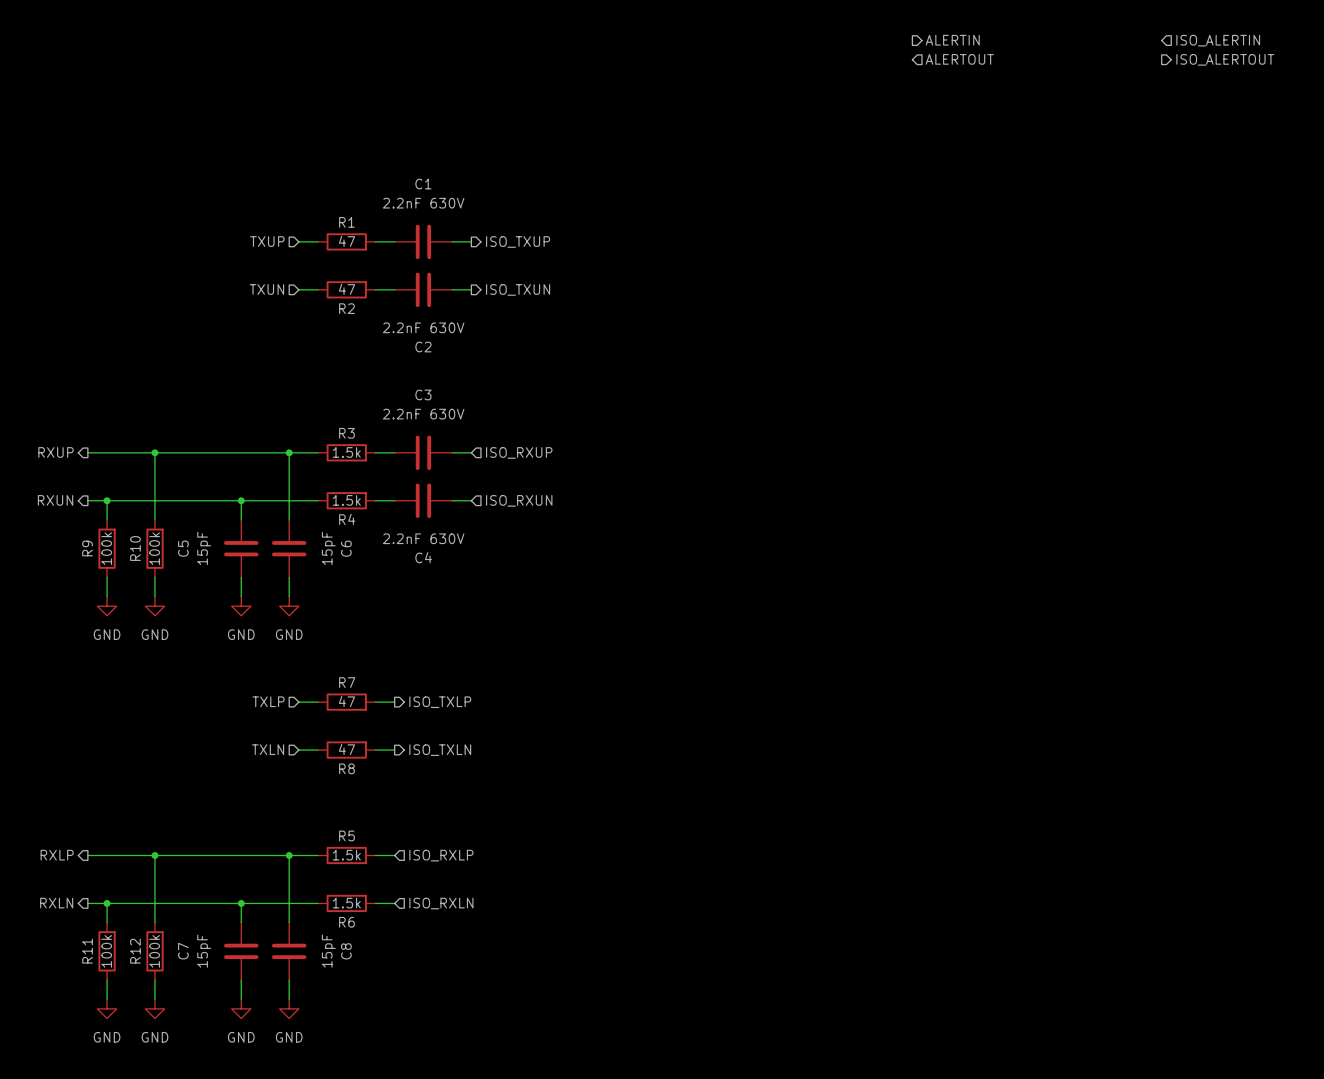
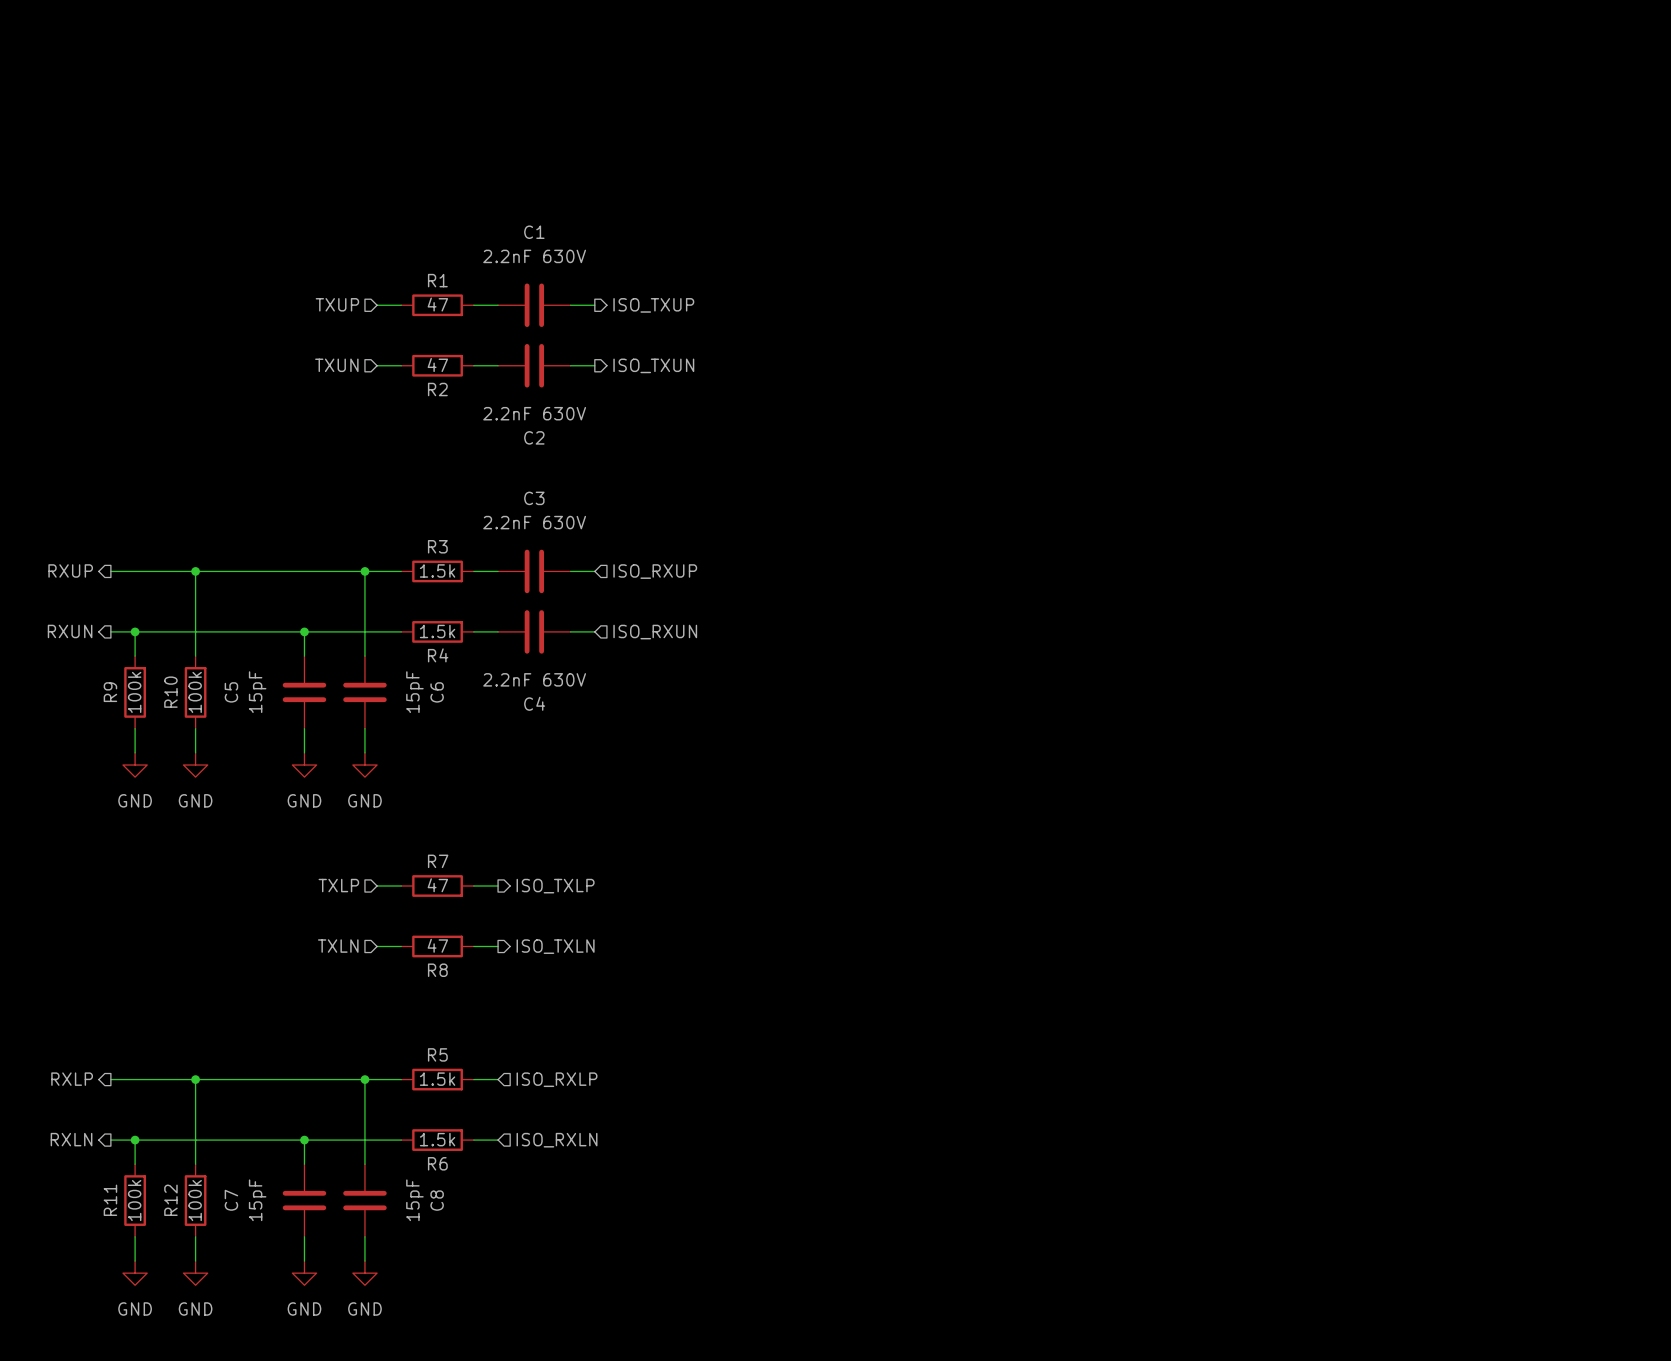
hierarchical label: ALERTIN (952, 40) -> none
hierarchical label: ISO_ALERTIN (1218, 40) -> none
hierarchical label: ALERTOUT (959, 59) -> none
hierarchical label: ISO_ALERTOUT (1225, 59) -> none

